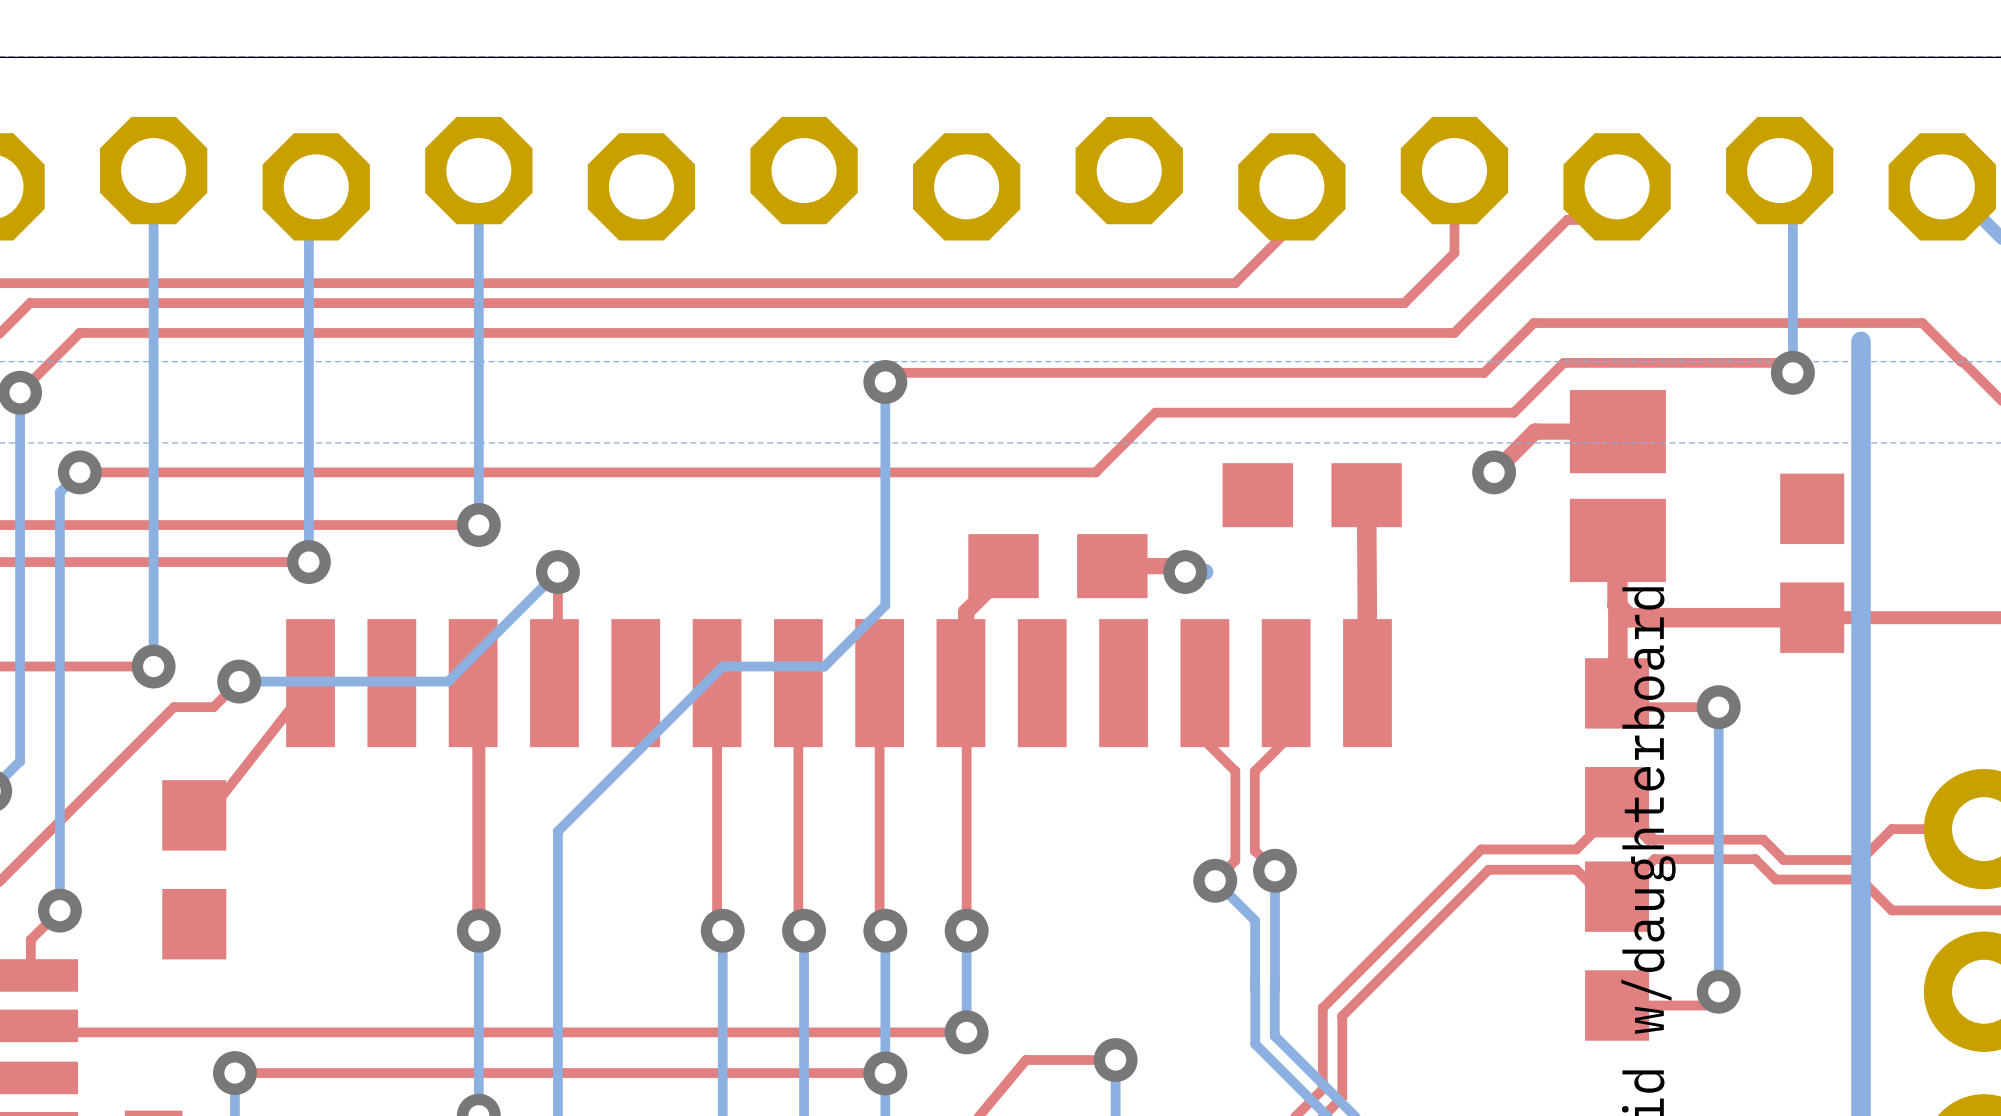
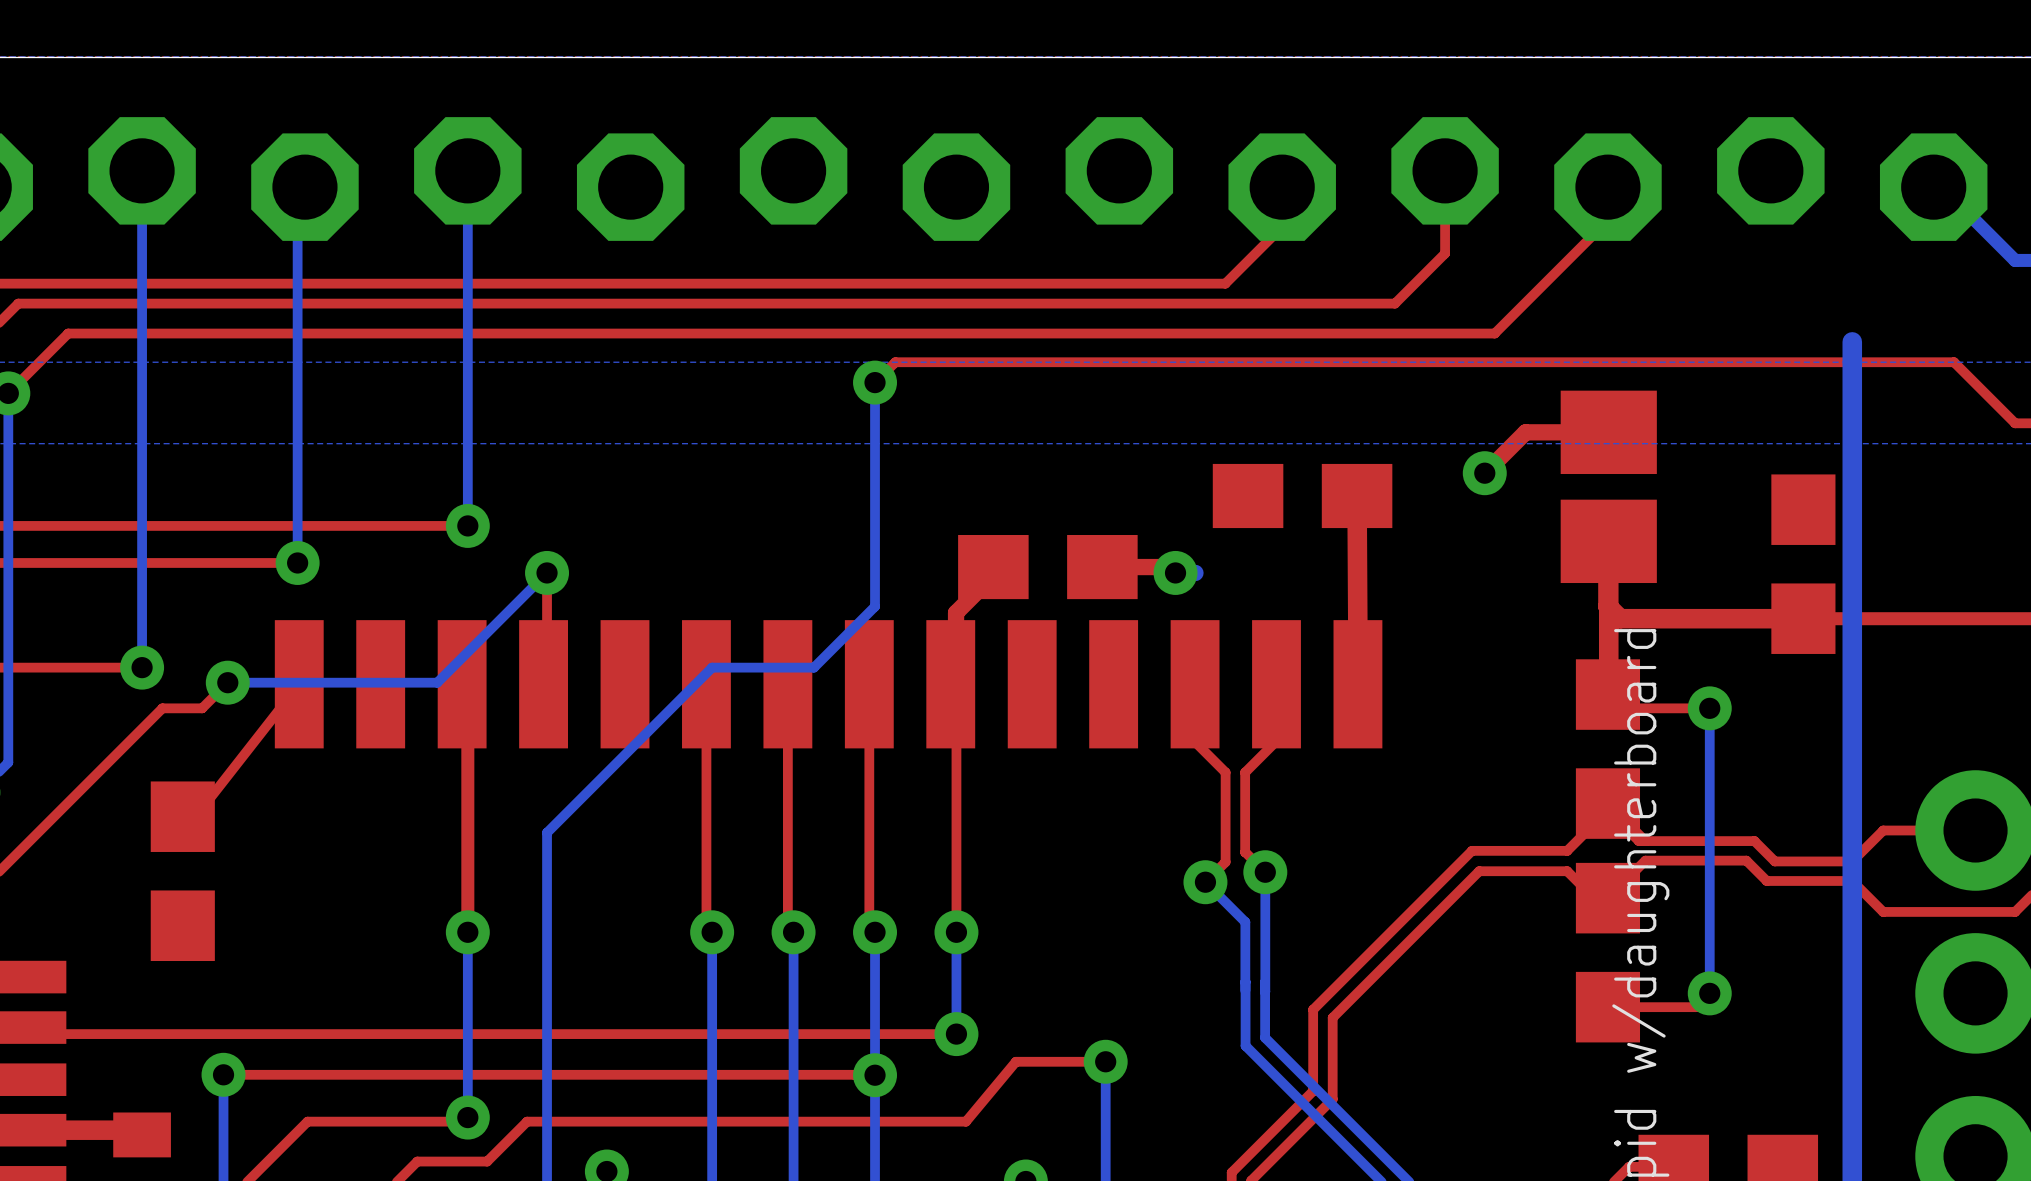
bottom track: (1779, 170) (1792, 183) (1792, 372) -> none
top track: (1617, 186) (1583, 219) (1567, 219) (1454, 332) -> (1607, 187) (1607, 220) (1494, 333) (1444, 333)
top track: (1960, 361) (1922, 323) (1533, 323) (1484, 372) (894, 372) -> (1952, 362) (895, 362) (884, 373)
top track: (1792, 372) (1782, 362) (1563, 362) (1514, 412) (1155, 412) (1095, 472) (79, 472) -> none
via: (1792, 372) -> none
bottom track: (79, 472) (59, 492) (59, 910) -> none
via: (79, 472) -> none
top track: (59, 910) (30, 939) (30, 975) -> none
via: (59, 910) -> none

